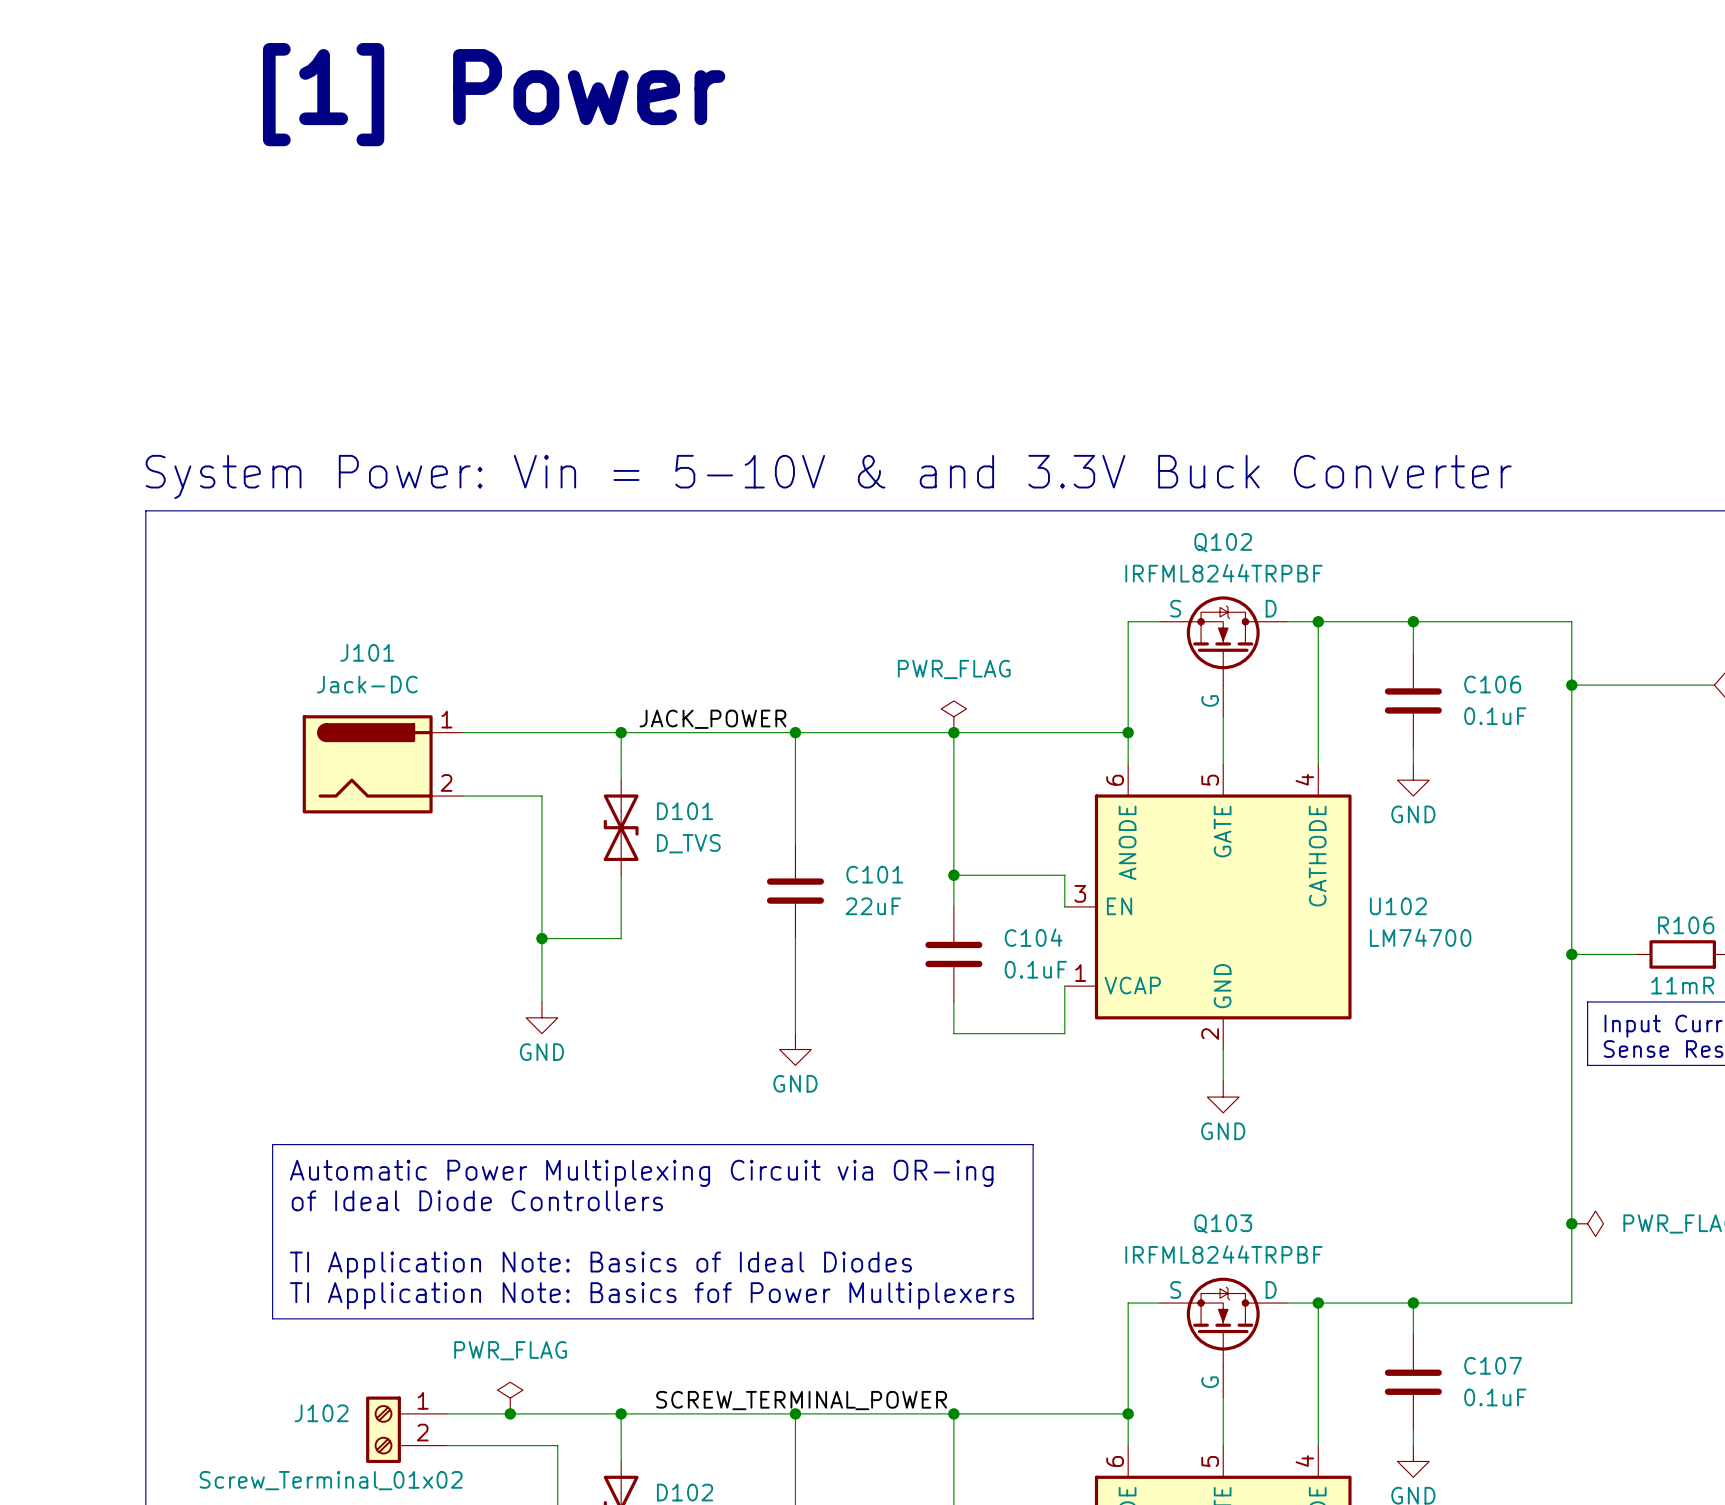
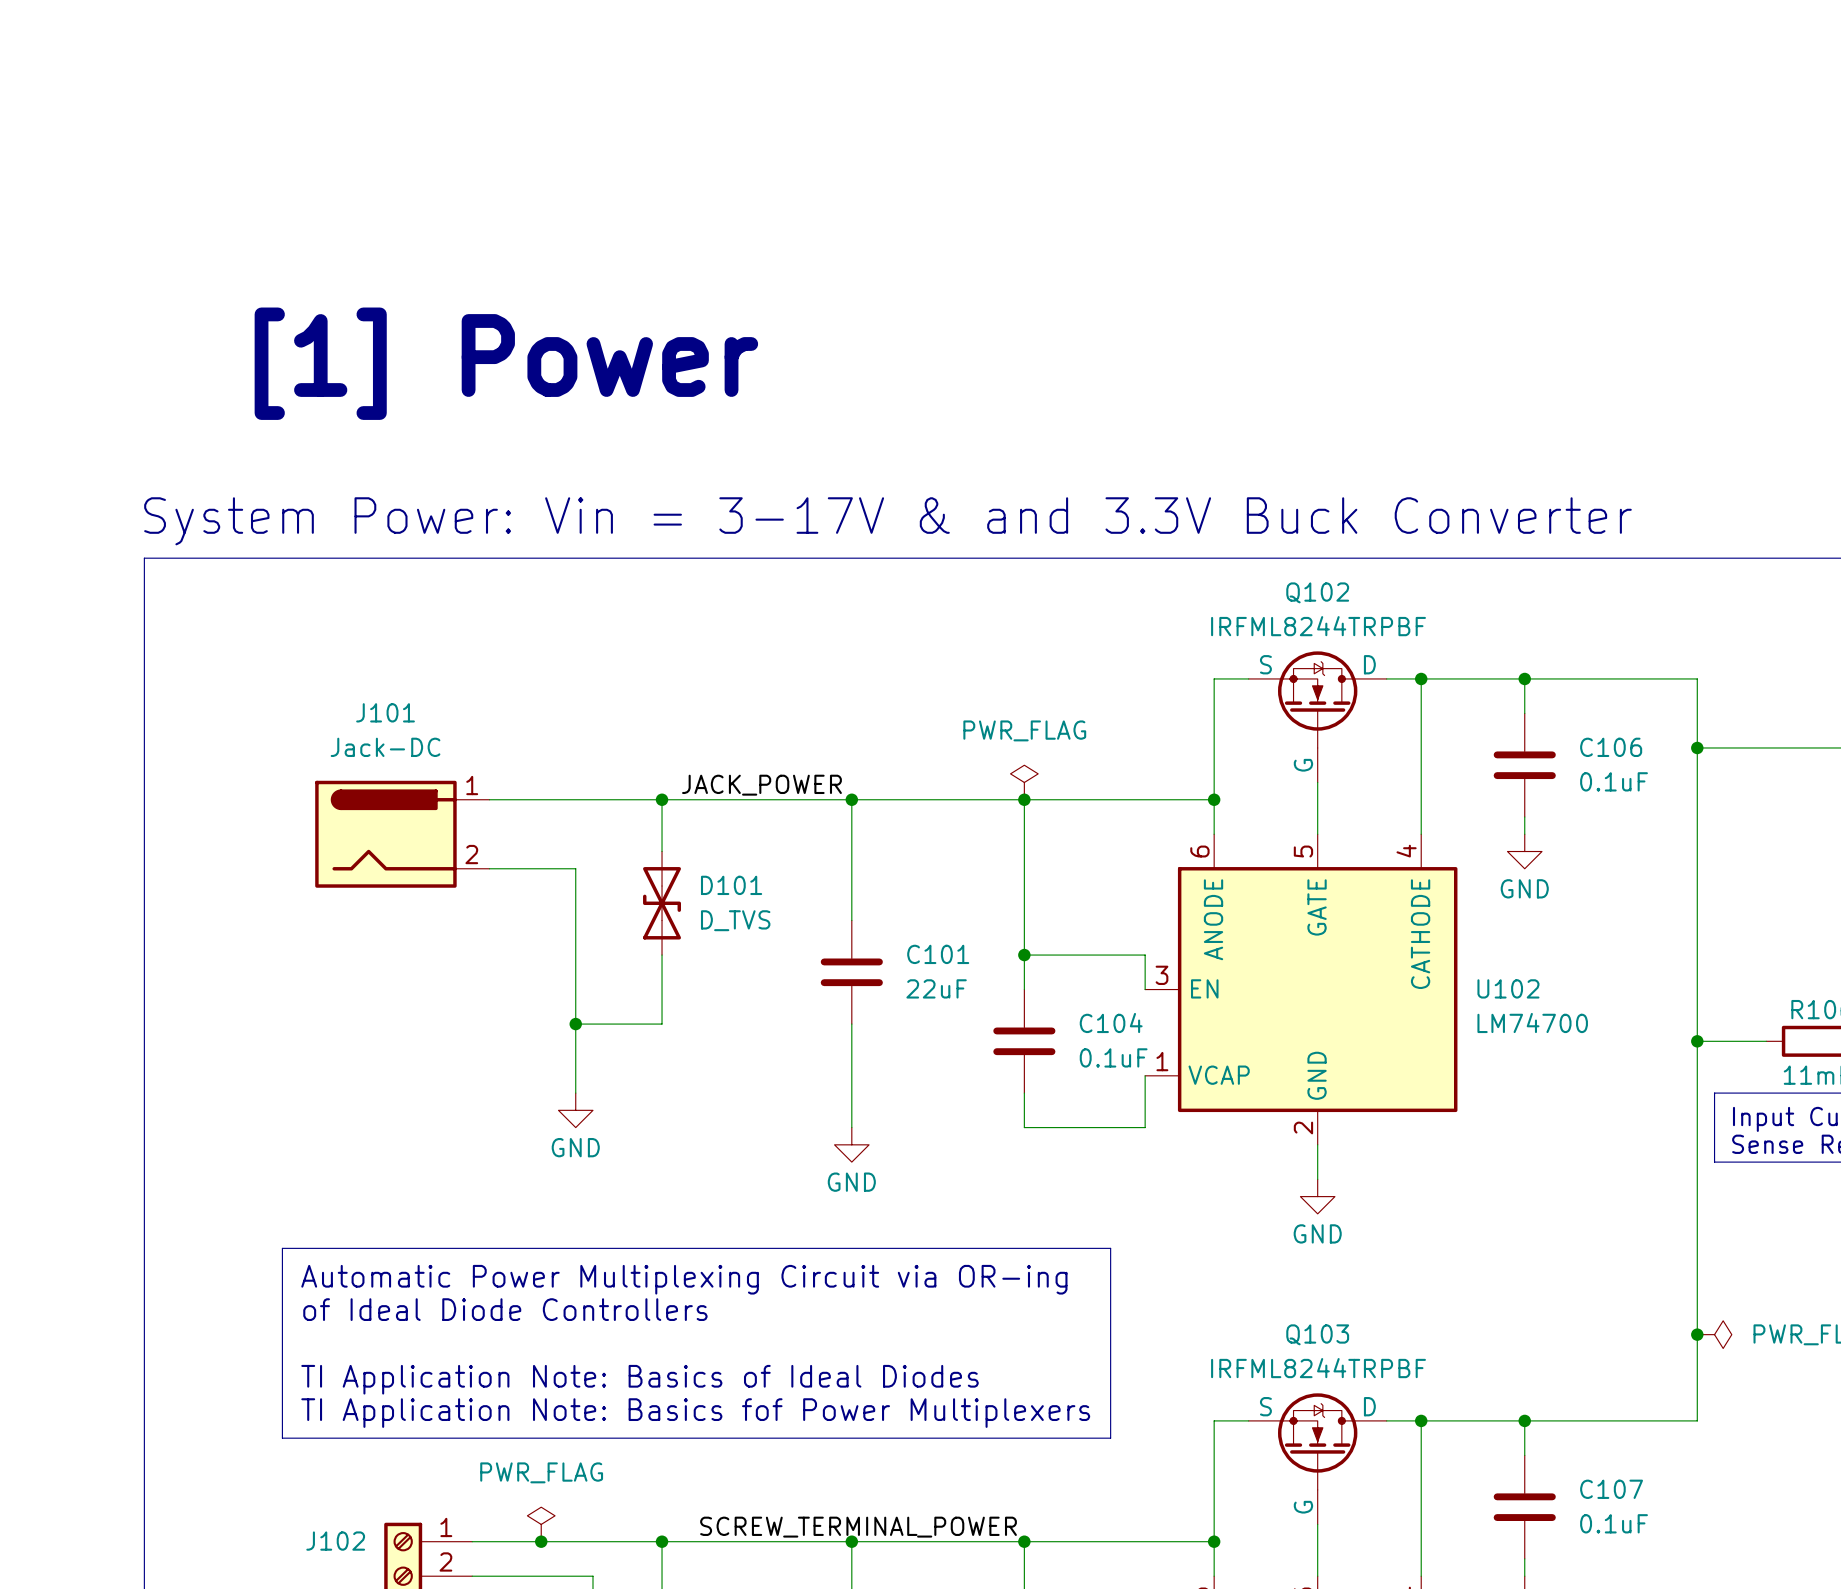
text position: [1] Power (494, 94) -> [1] Power (506, 363)
text: System Power: Vin = 5-10V & and 3.3V Buck Converter (828, 476) -> System Power: Vin = 3-17V & and 3.3V Buck Converter (887, 521)

